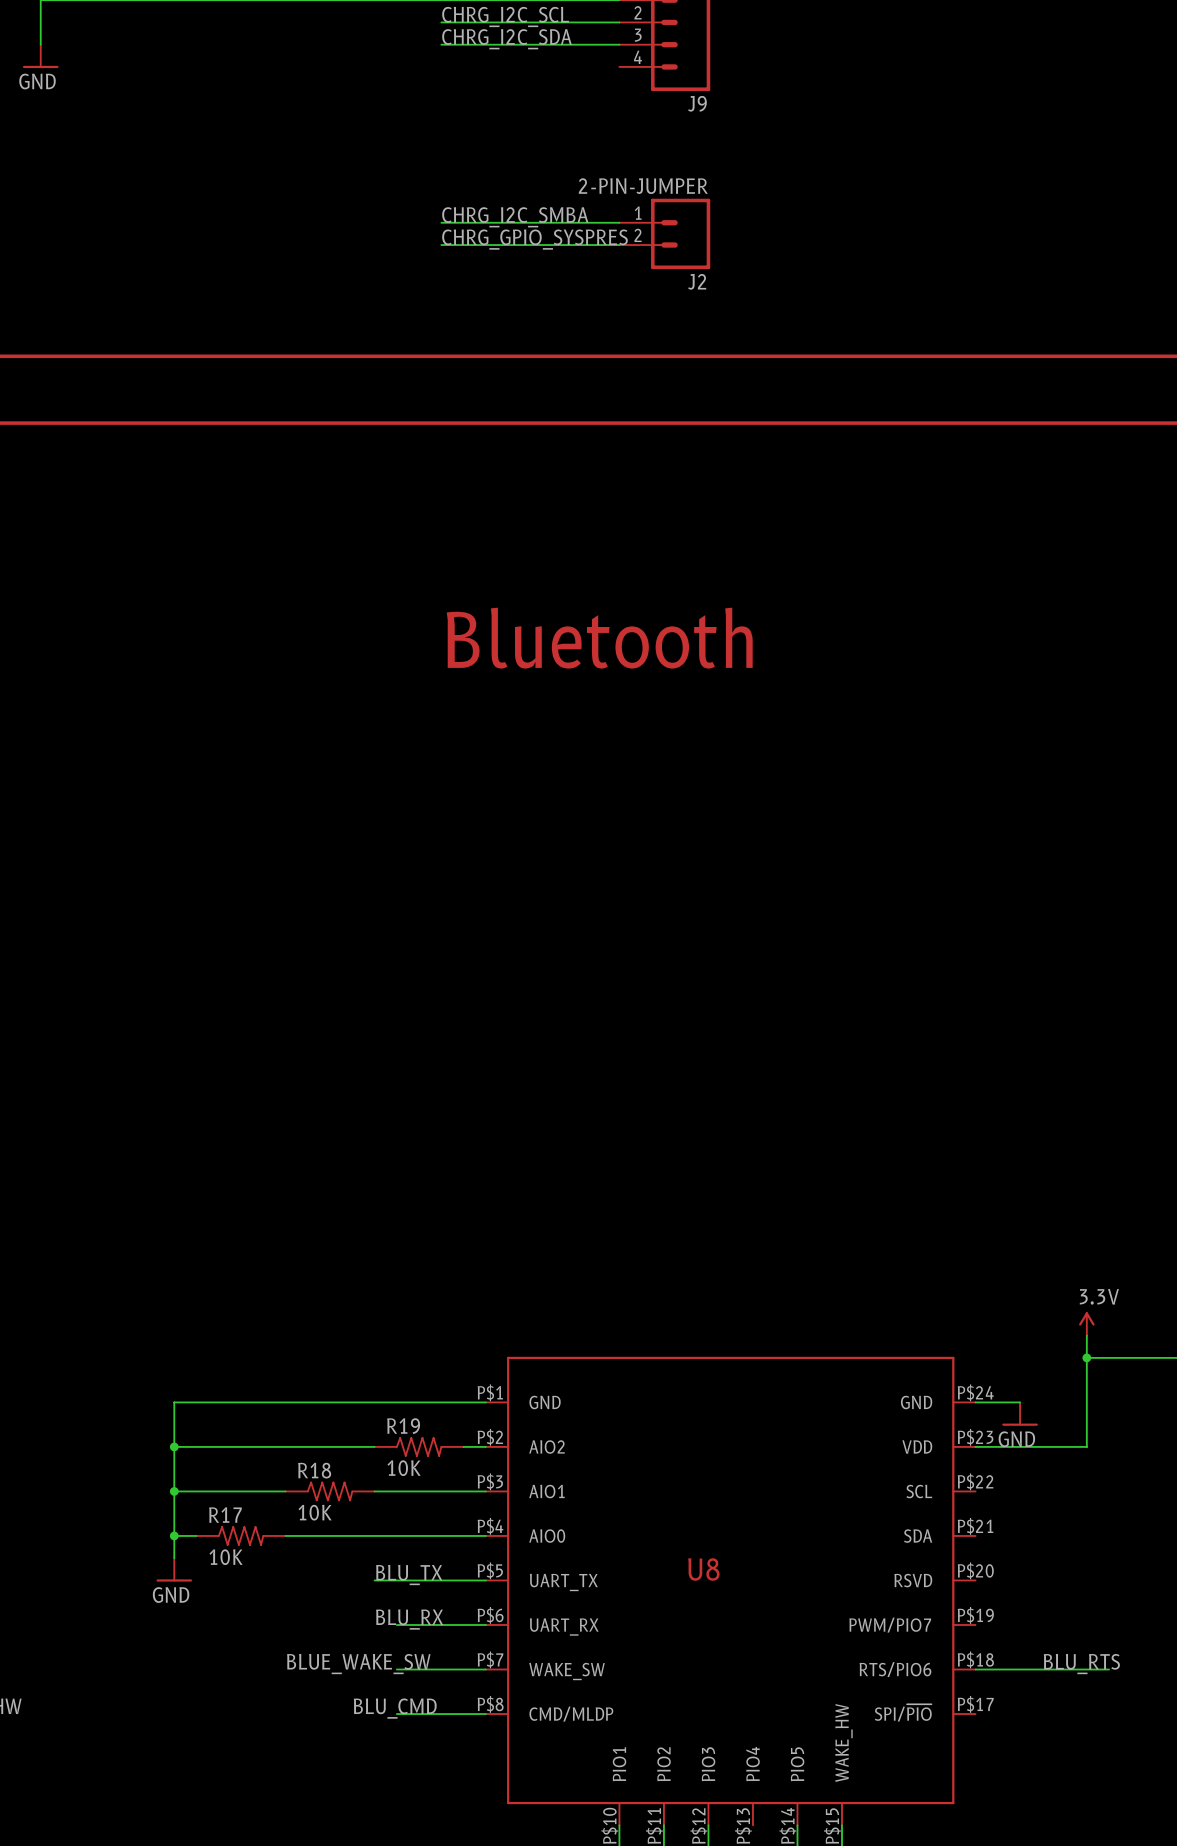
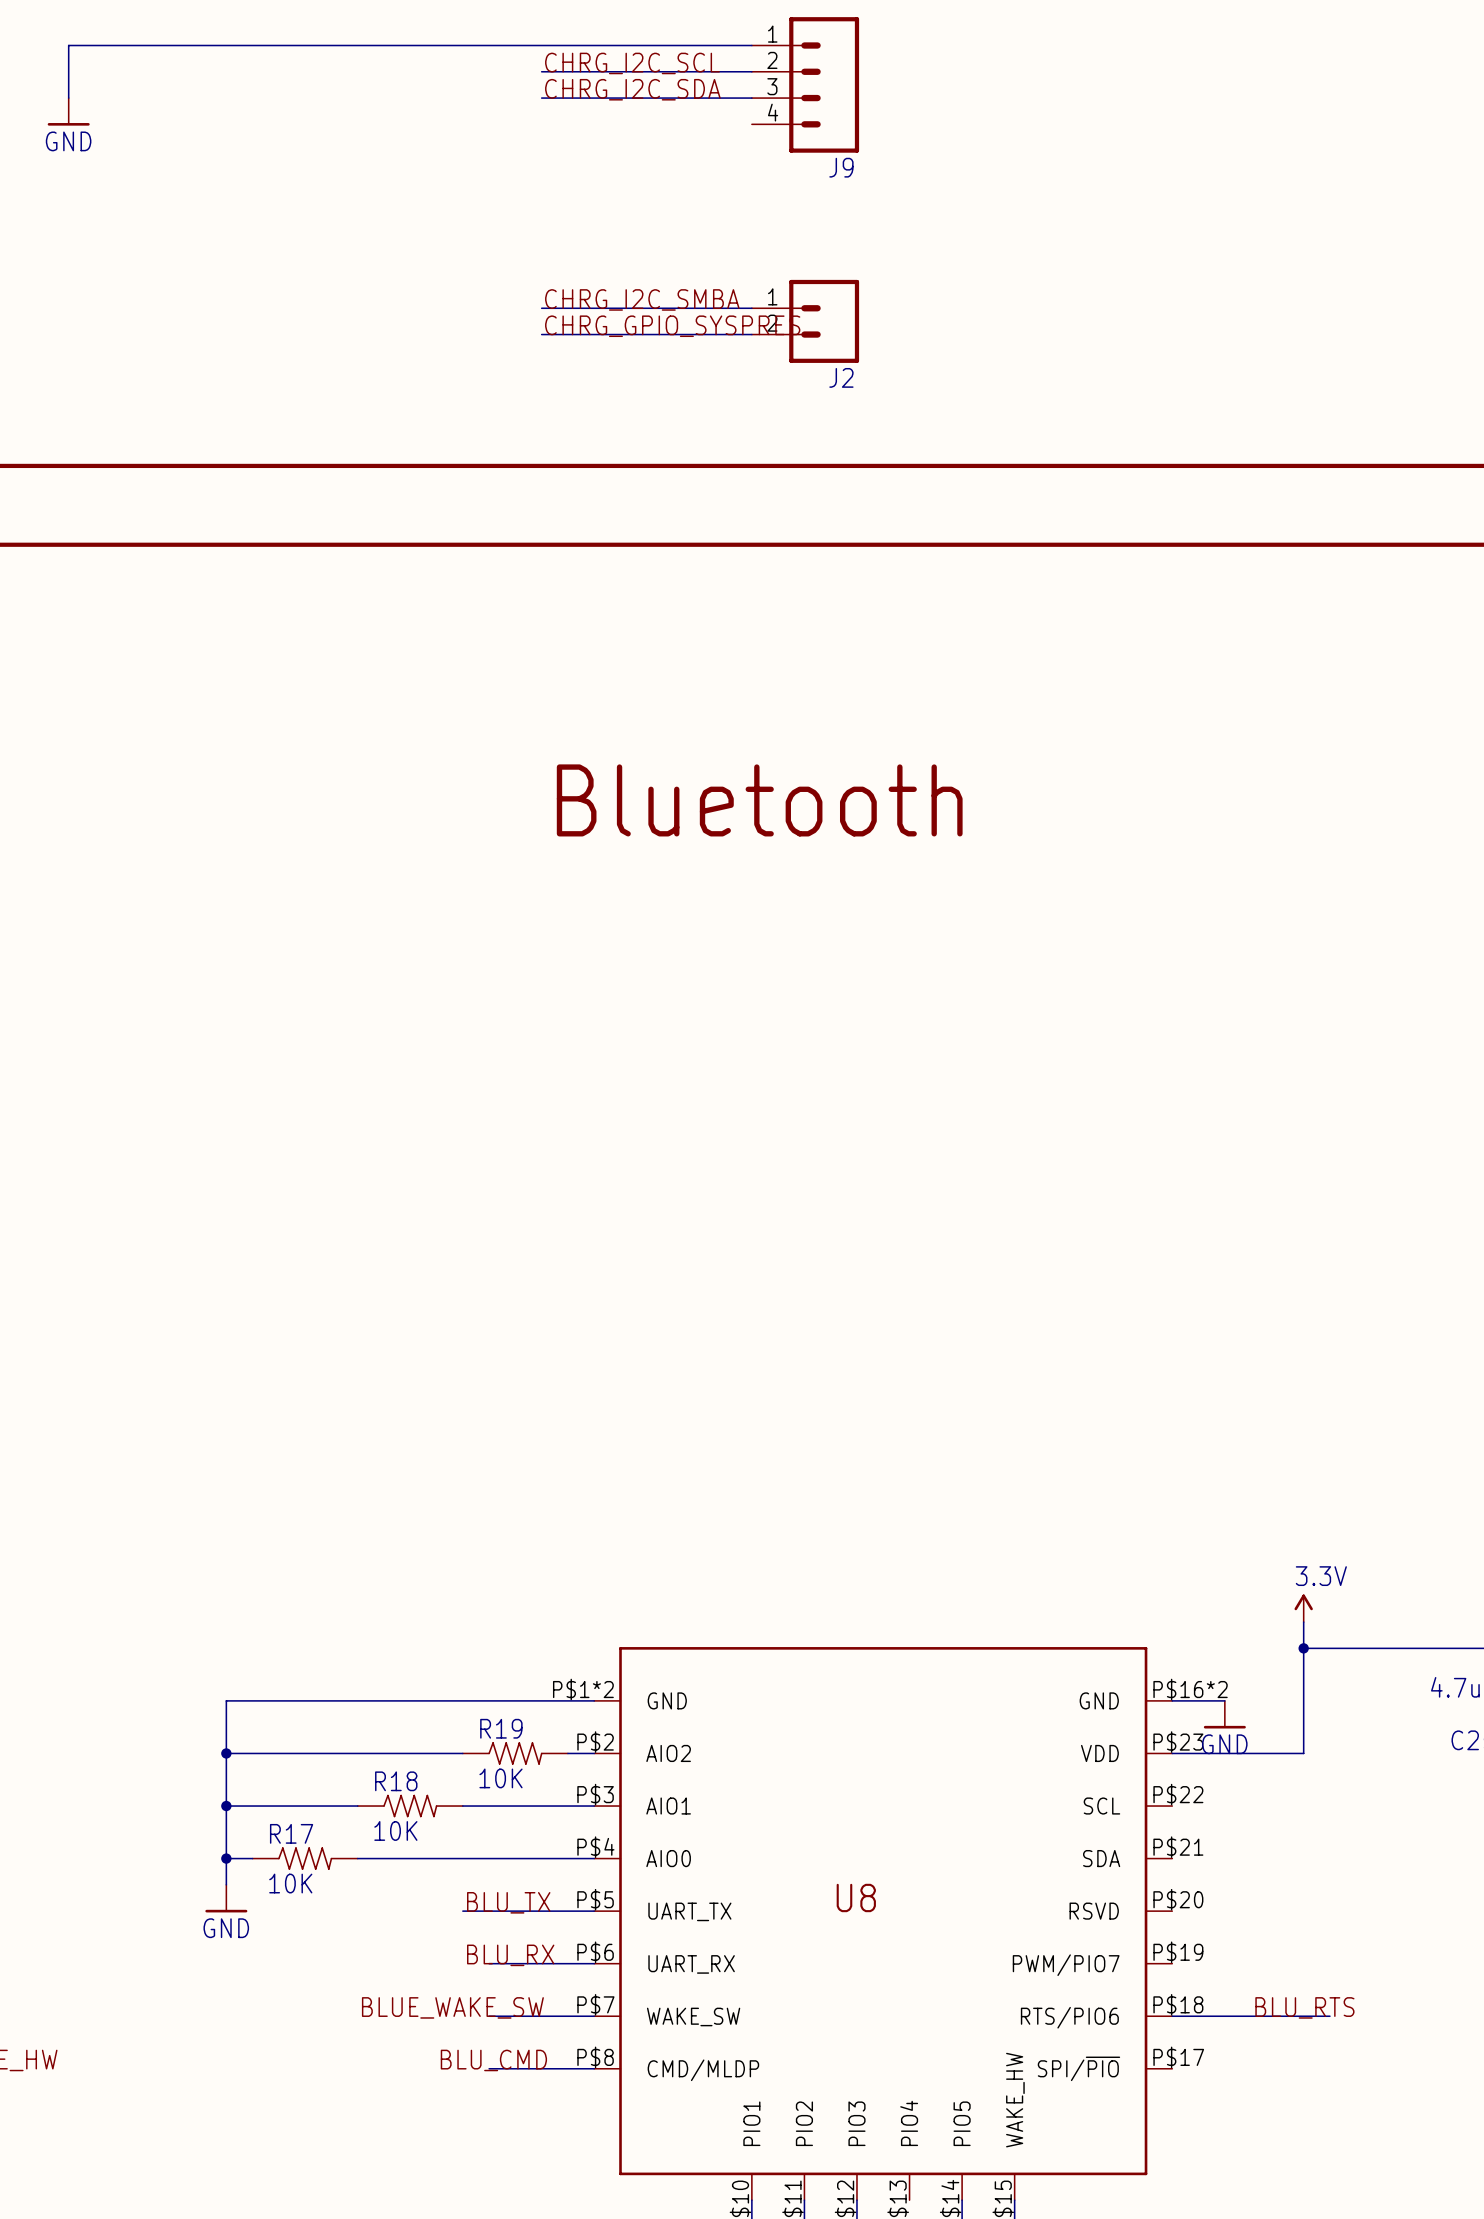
J2 value: 2-PIN-JUMPER (643, 186) -> none
U8 pin number: P$1 (490, 1392) -> P$1*2 (583, 1689)
U8 pin number: P$24 (975, 1392) -> P$16*2 (1190, 1689)

